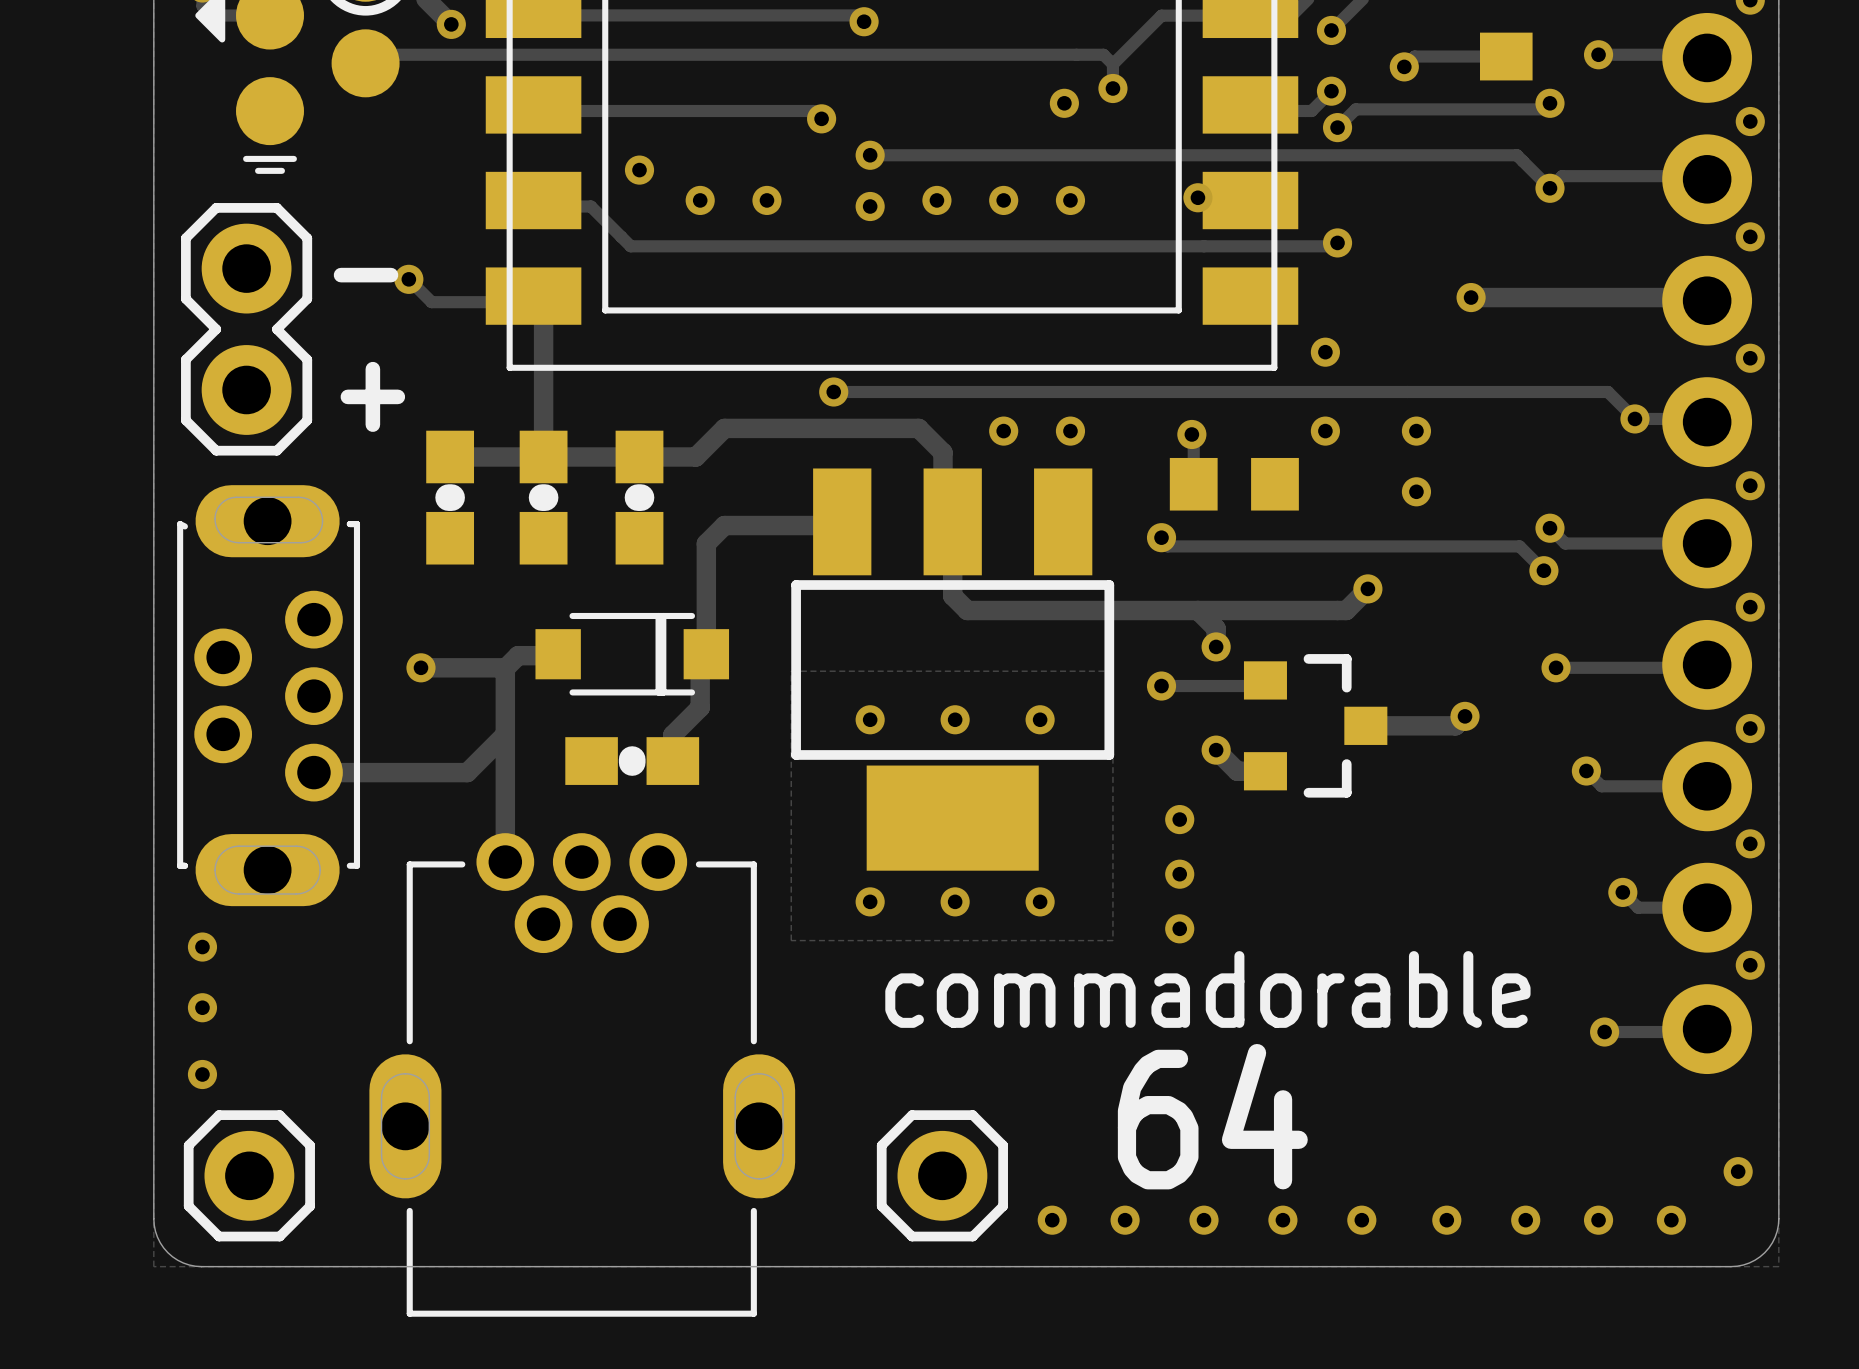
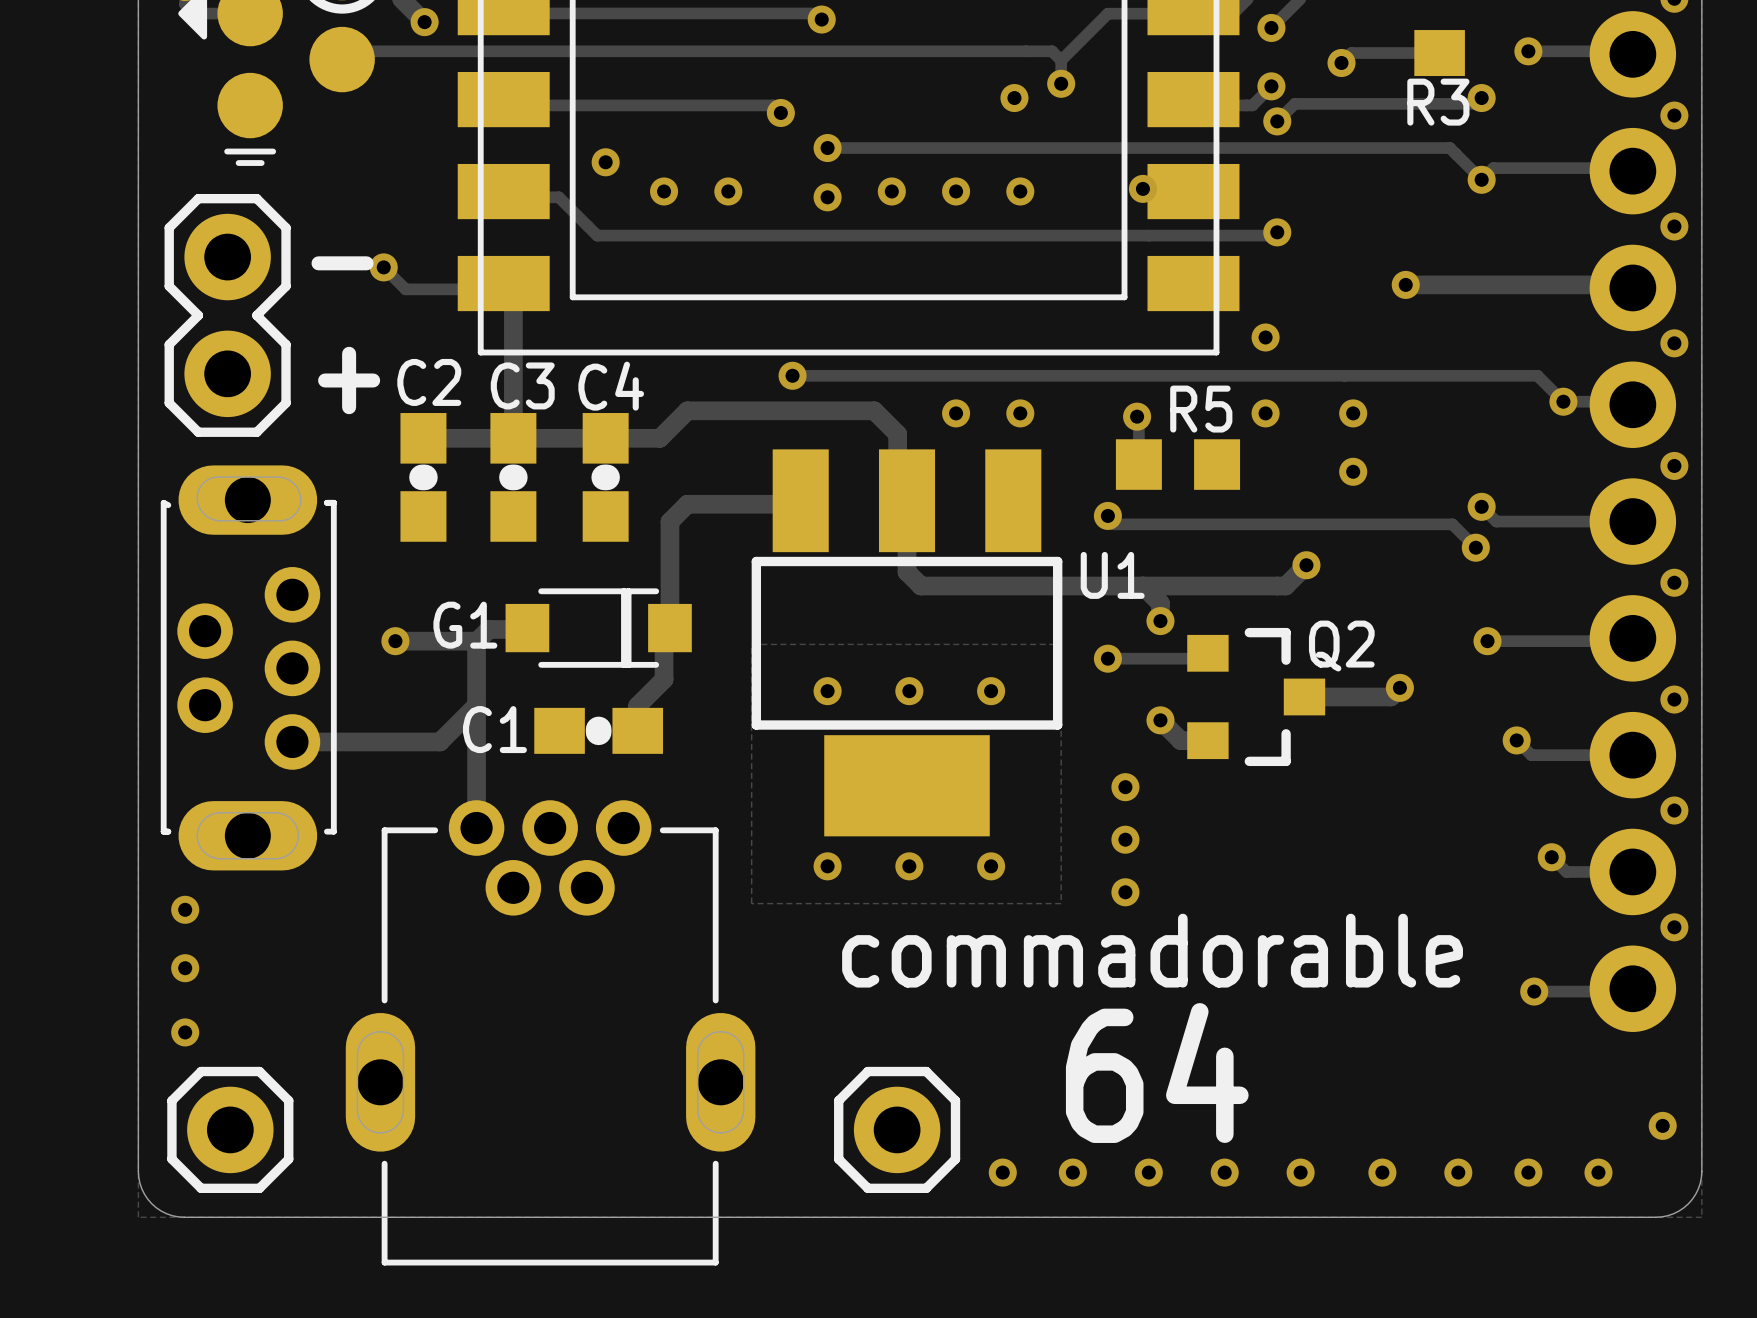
R3 name: none -> R3 (1438, 102)
C2 name: none -> C2 (429, 382)
C3 name: none -> C3 (522, 385)
C4 name: none -> C4 (611, 386)
R5 name: none -> R5 (1201, 409)
U1 name: none -> U1 (1112, 575)
G1 name: none -> G1 (465, 625)
Q2 name: none -> Q2 (1341, 646)
C1 name: none -> C1 (494, 729)

